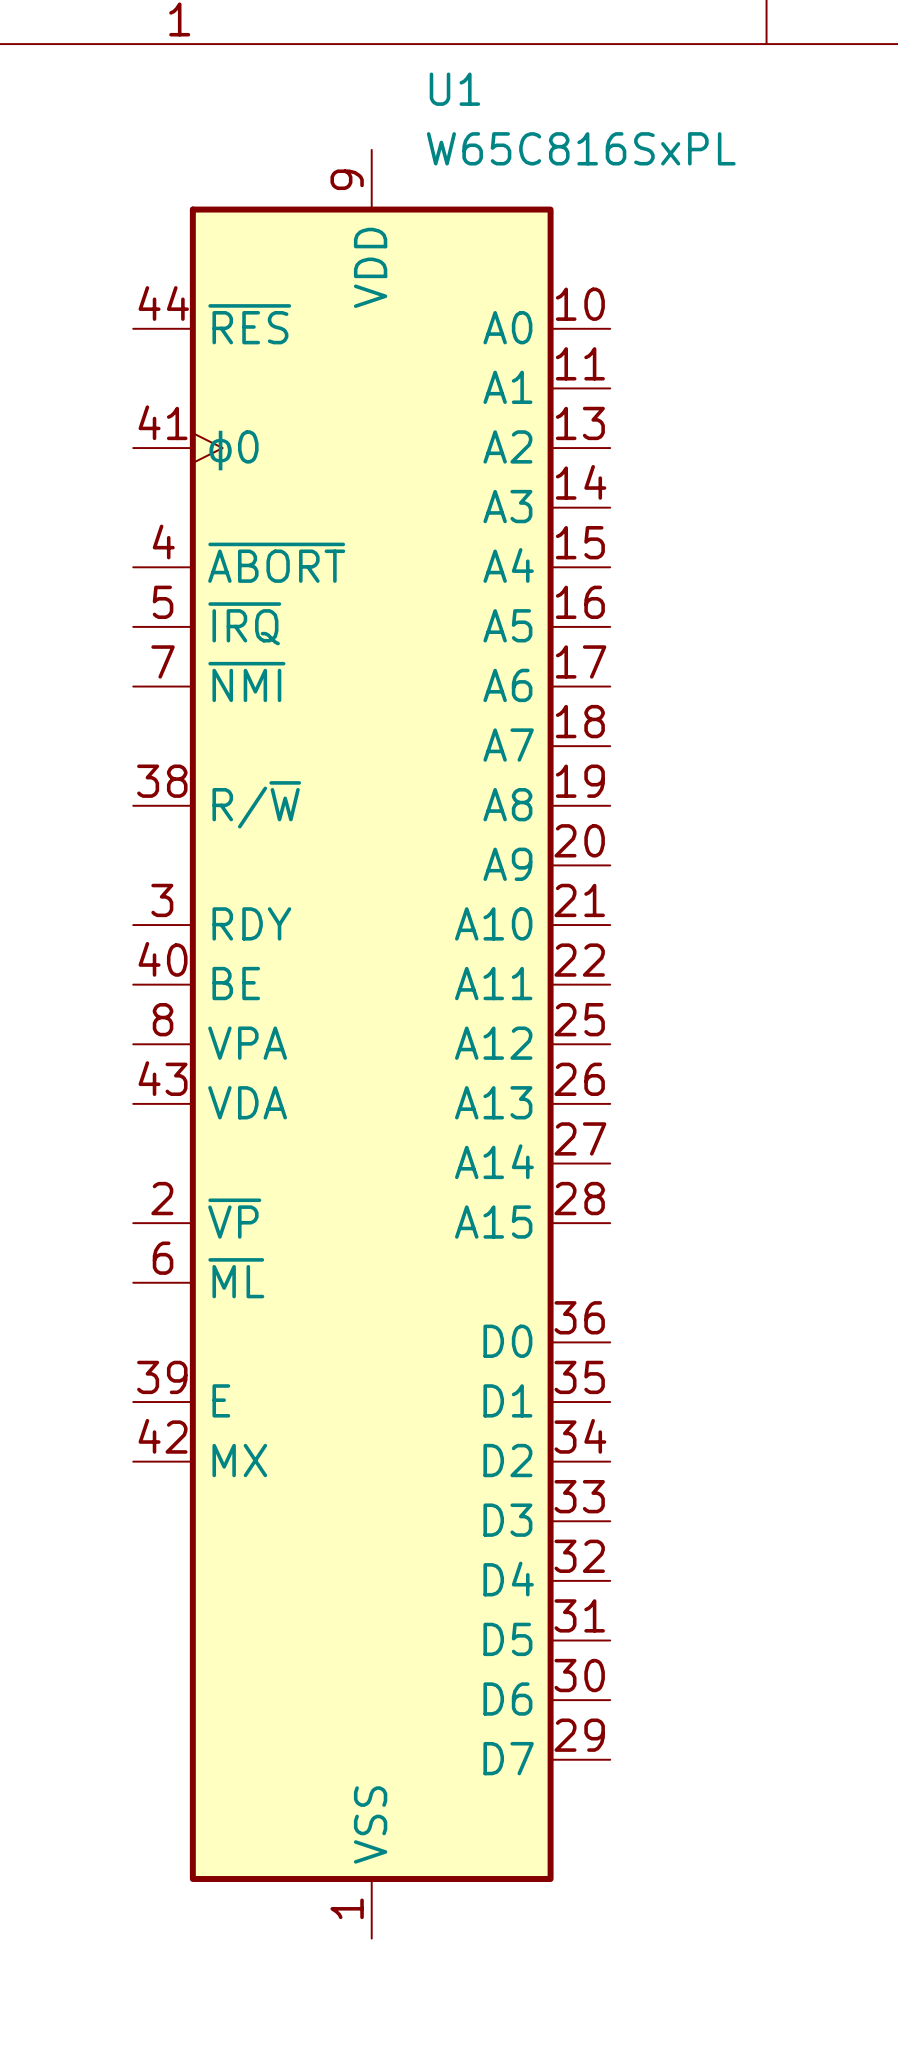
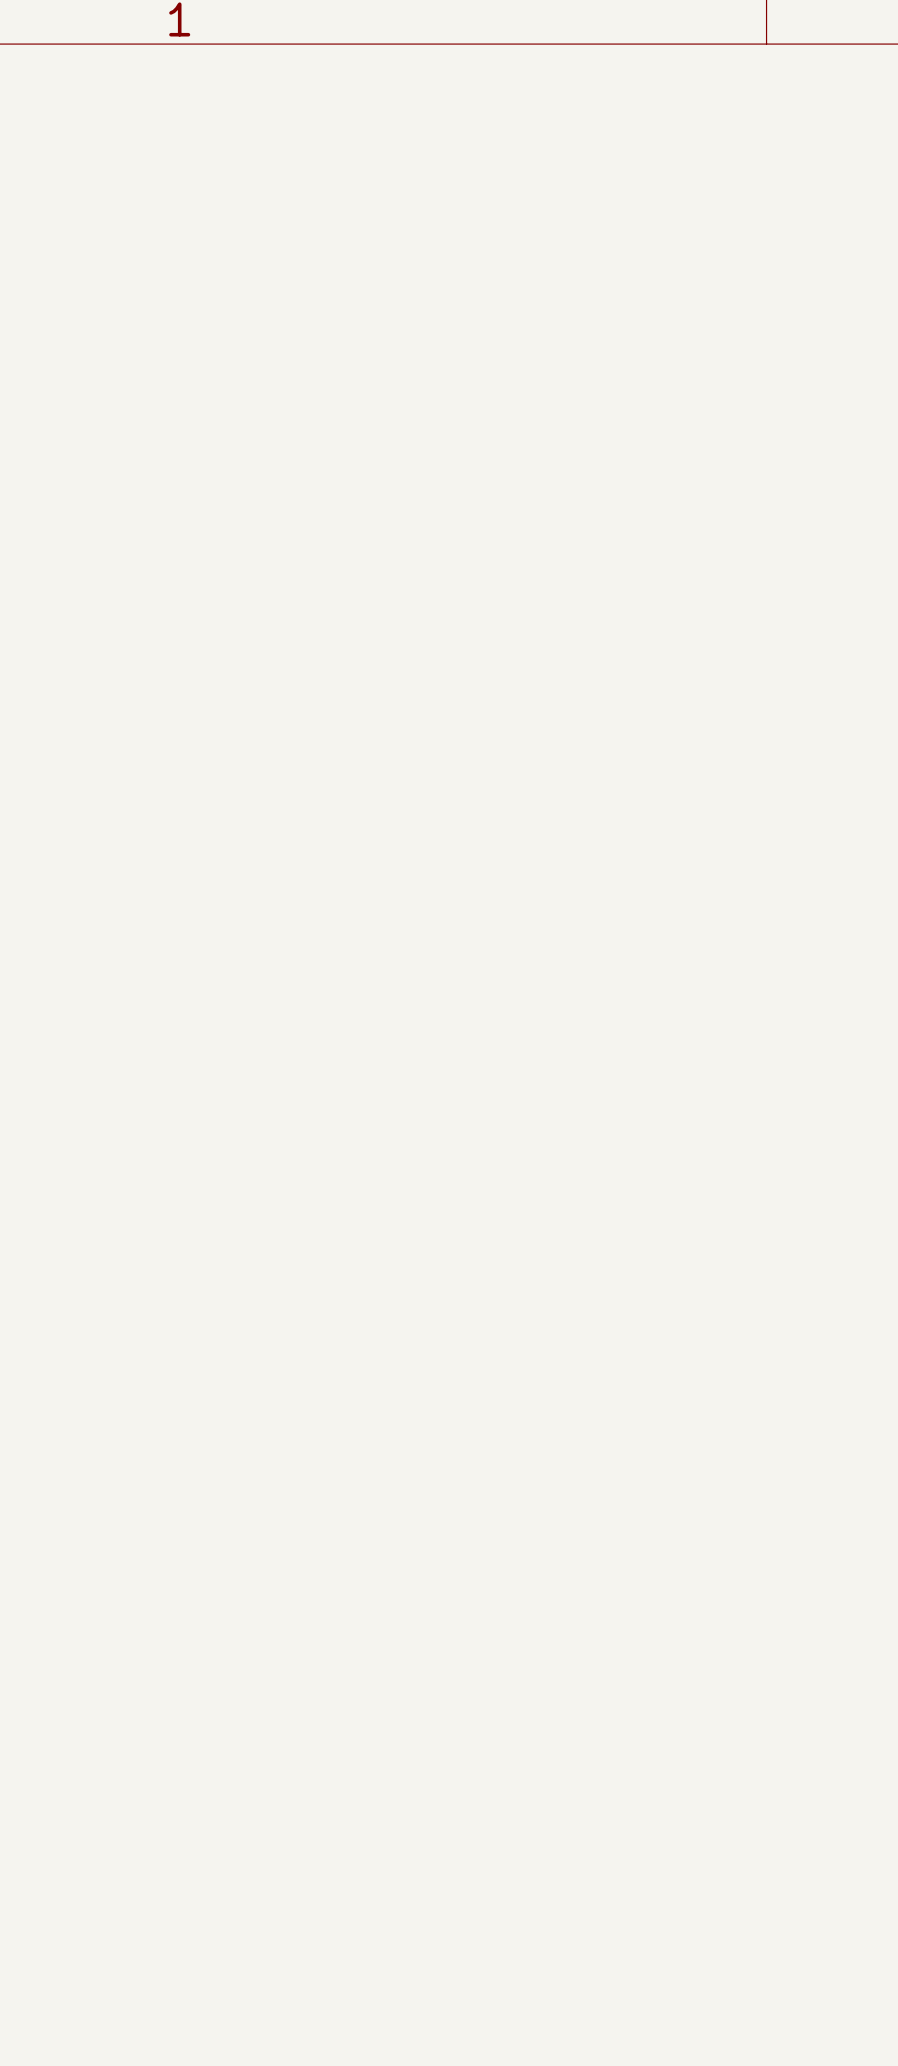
U1: W65C816SxPL (371, 1044) -> none

